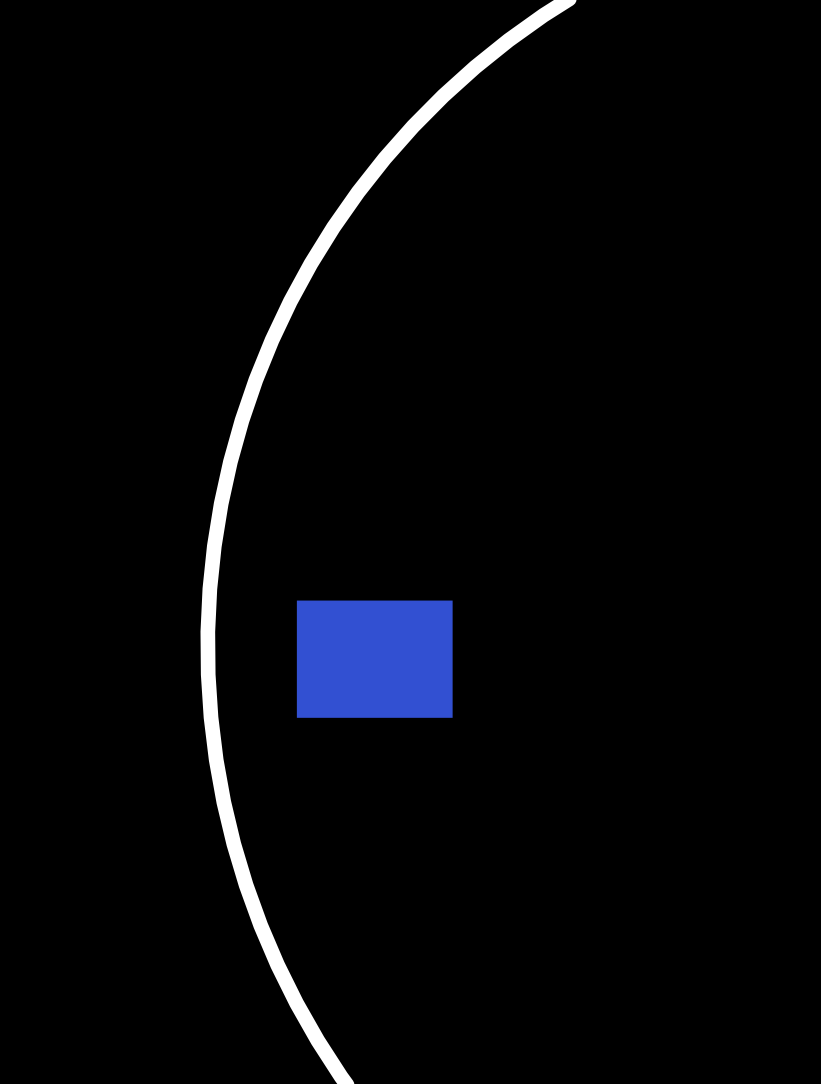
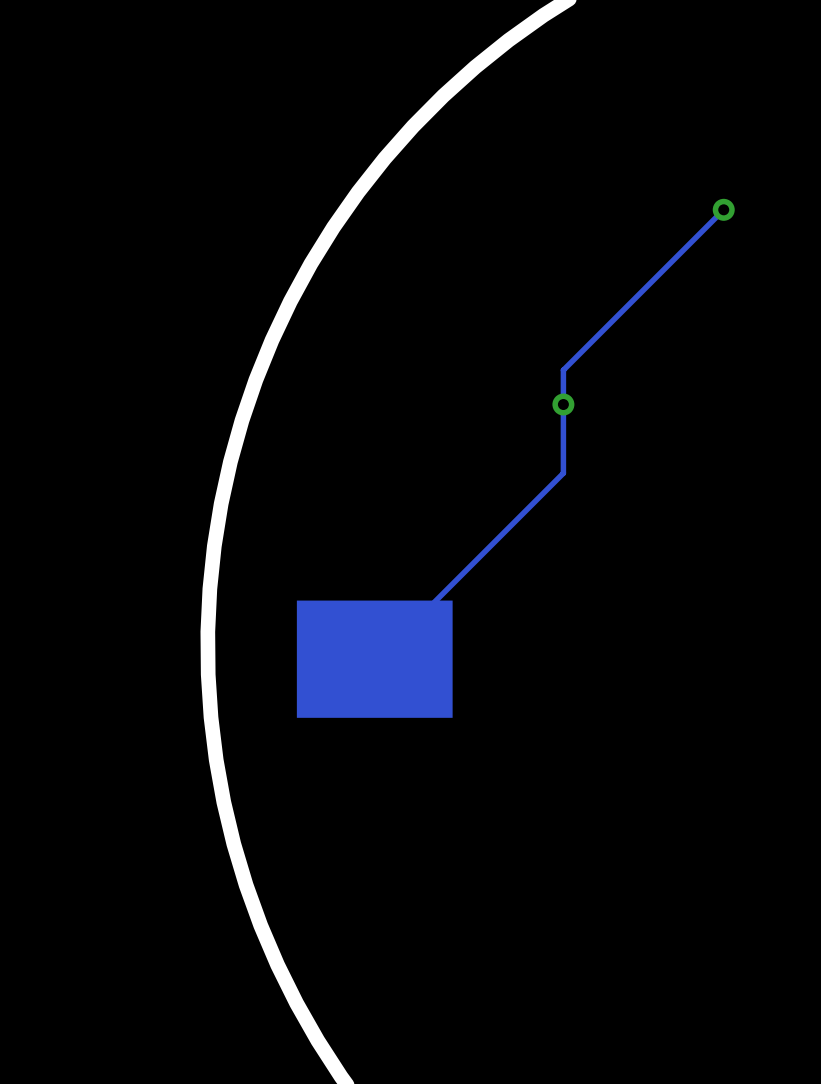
track: none -> (723, 209) (563, 370) (563, 473) (380, 656) (374, 659)
via: none -> (723, 209)
via: none -> (563, 404)

